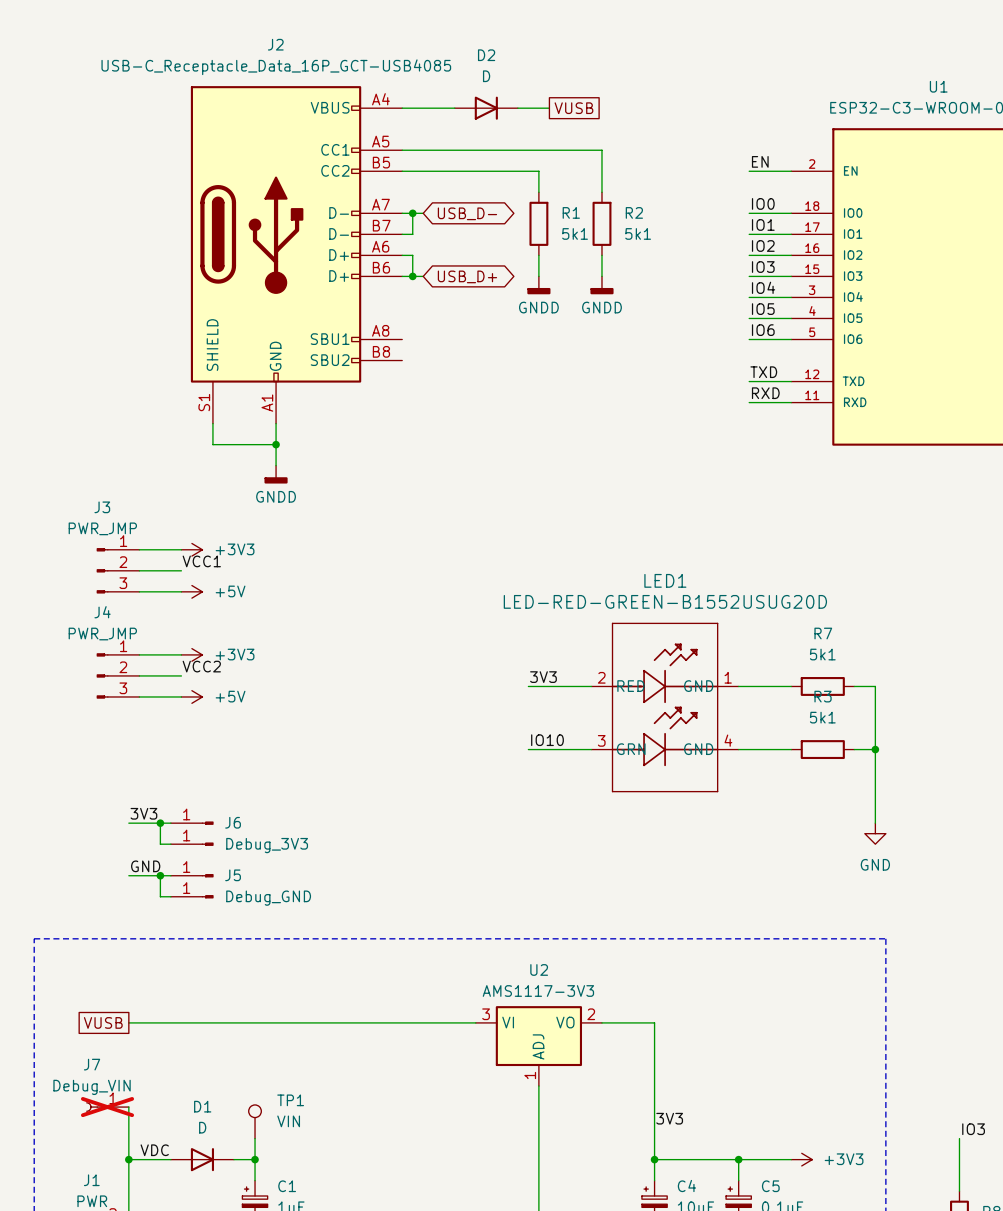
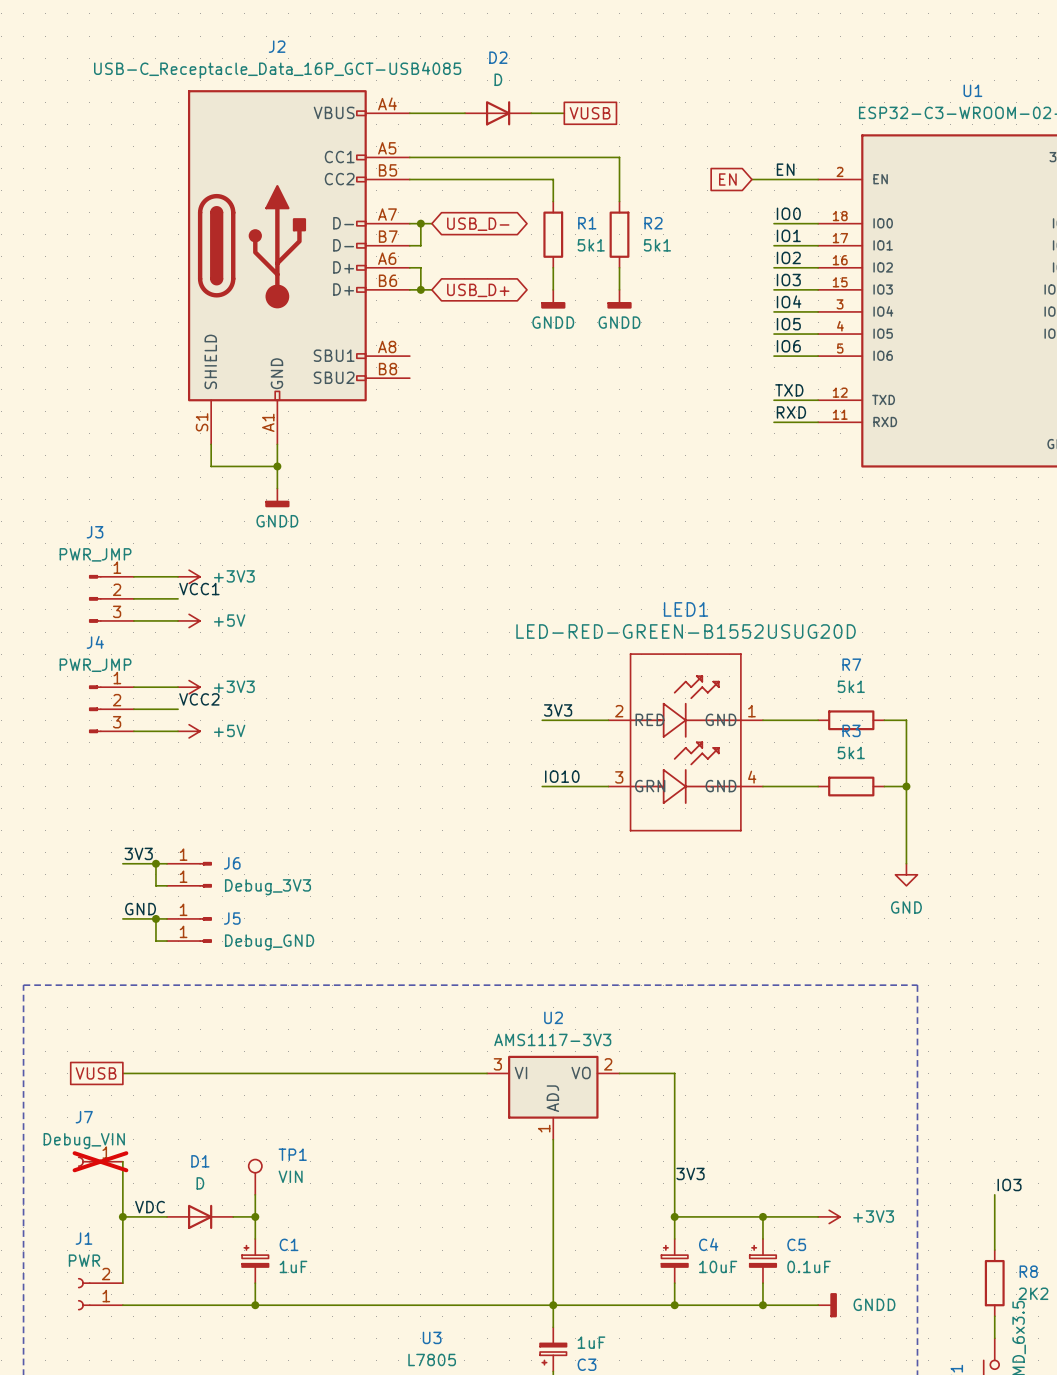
global label: none -> EN (727, 179)
wire: none -> (751, 179) (774, 179)

